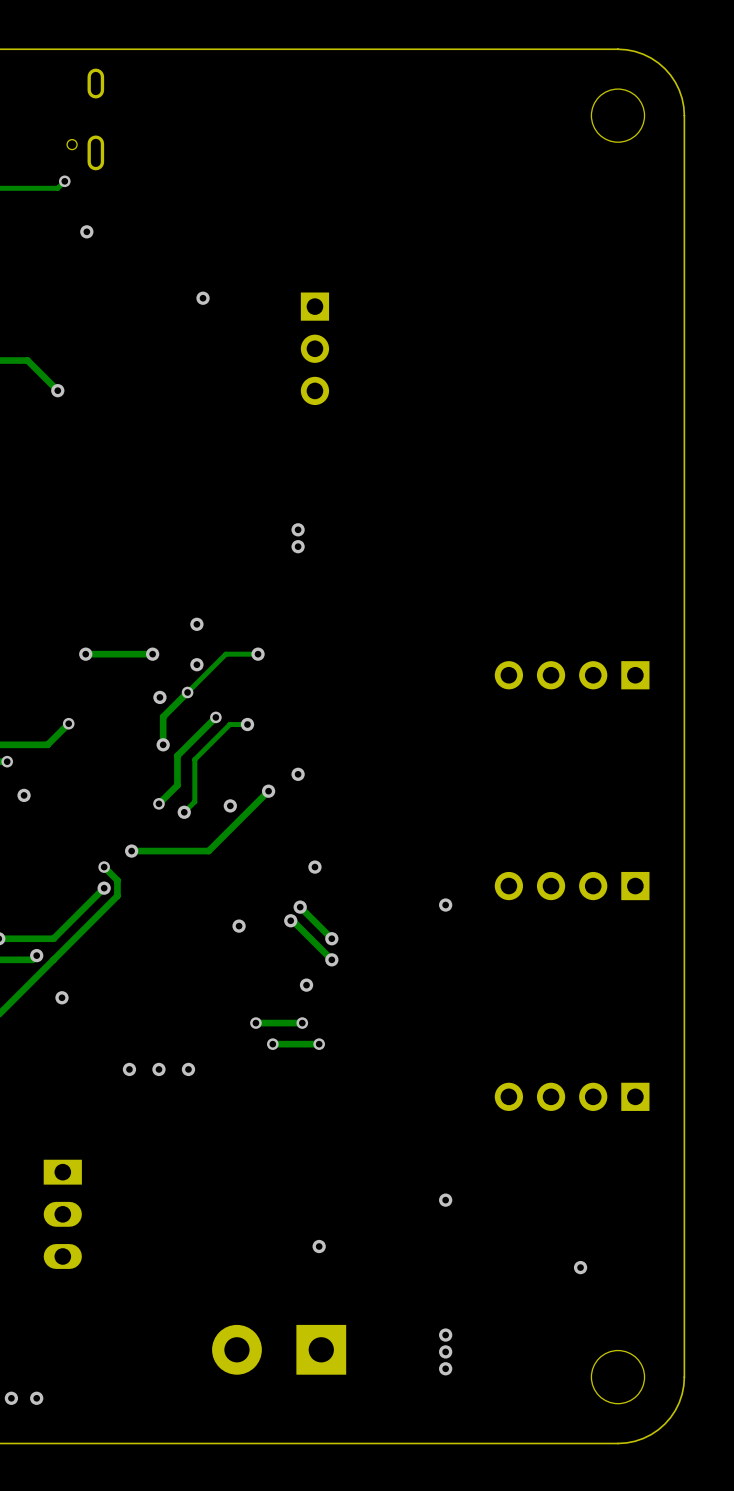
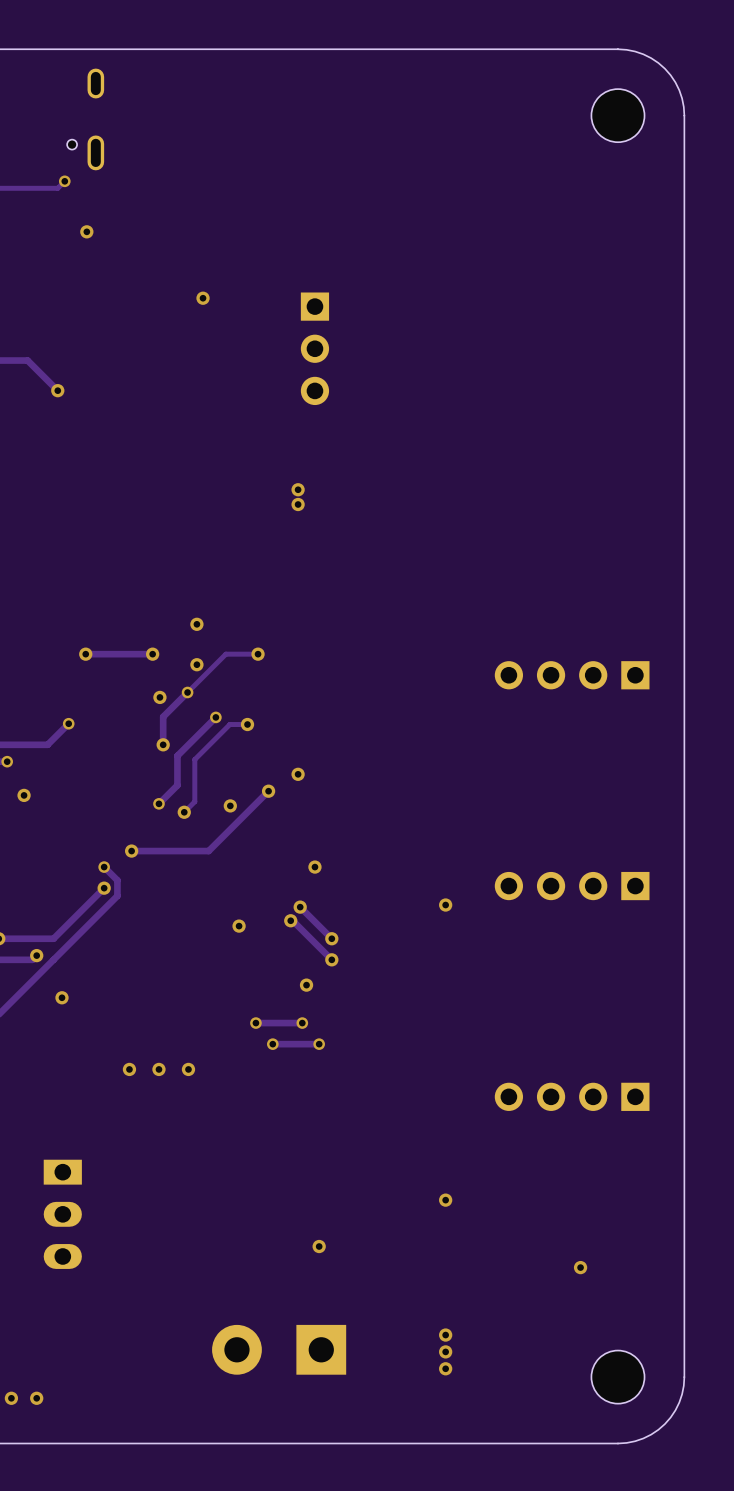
via: none -> (298, 489)
via: none -> (298, 504)
via: (298, 529) -> none
via: (298, 546) -> none

